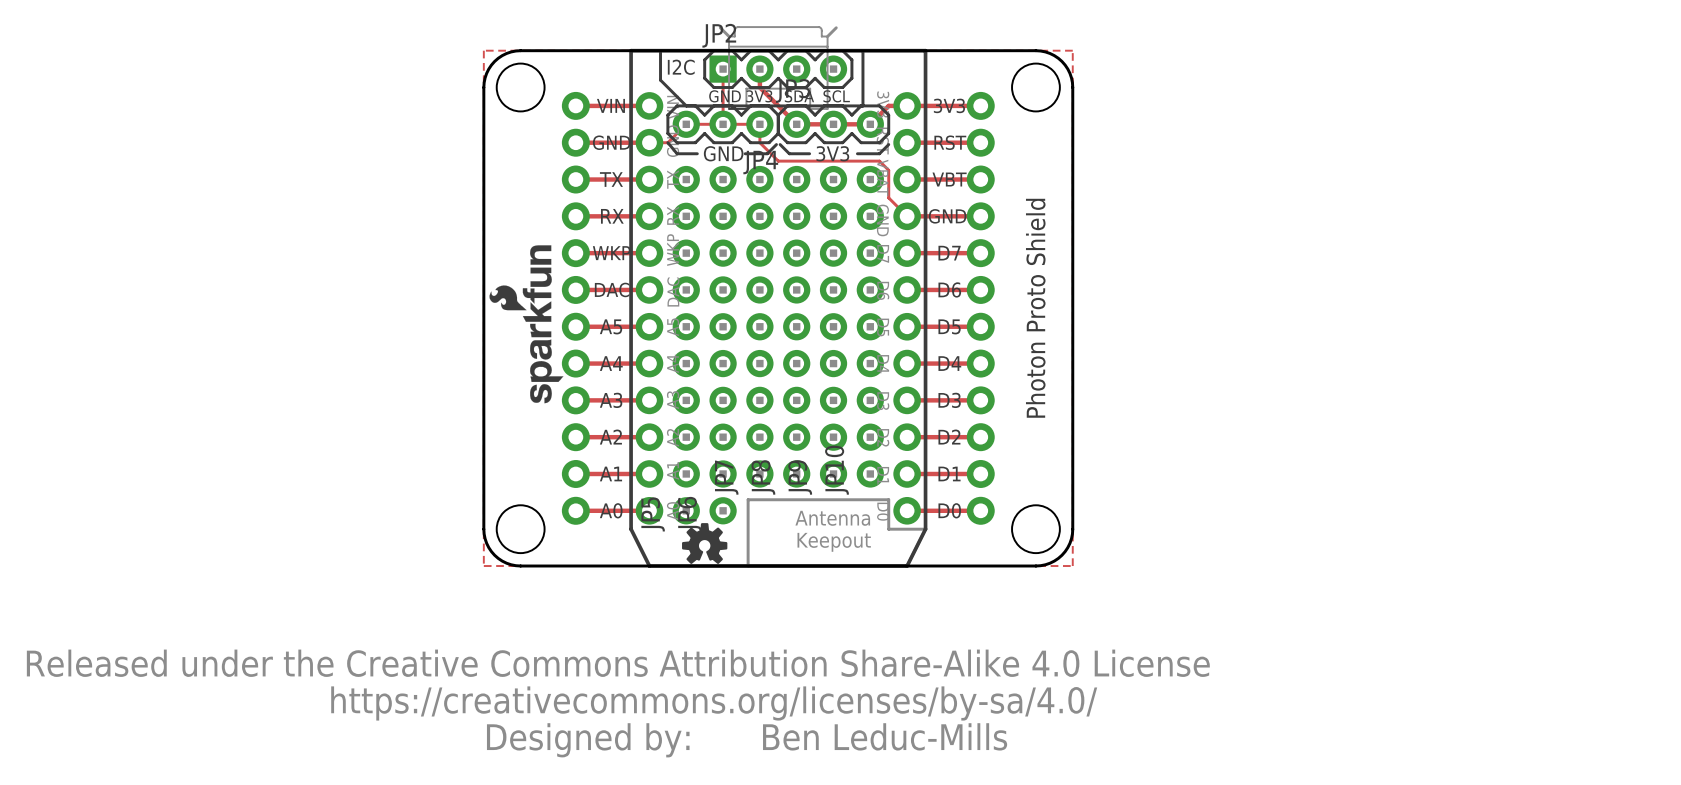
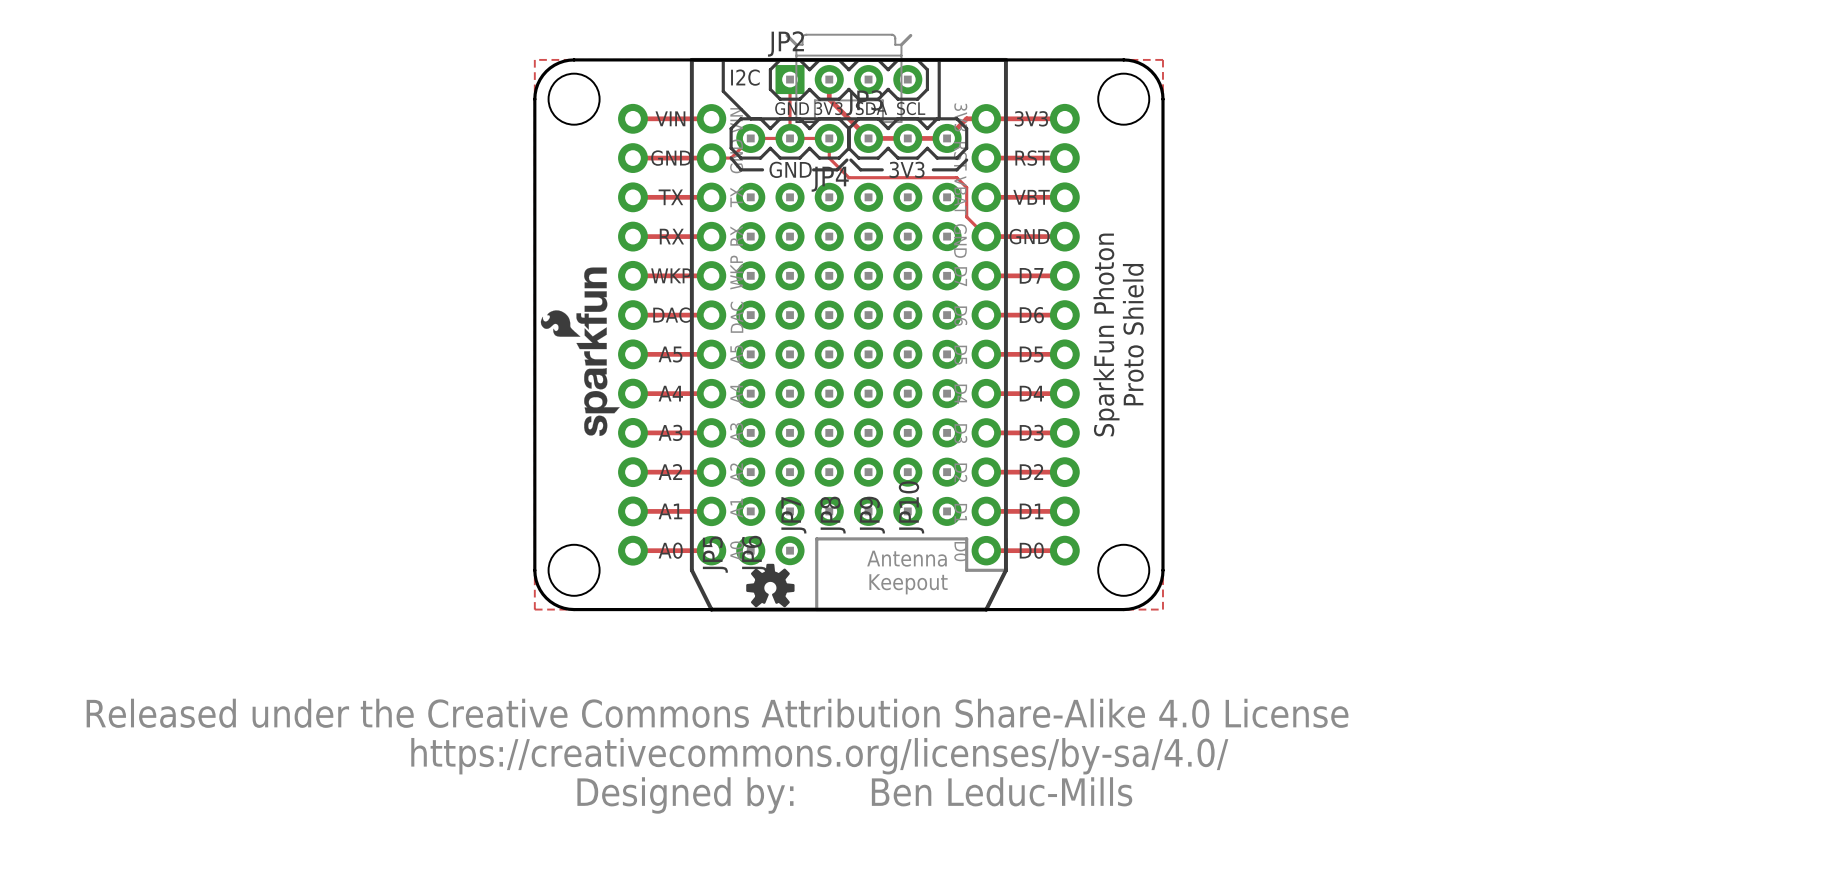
text: Photon Proto Shield (1035, 308) -> SparkFun Photon (1106, 334)
text: none -> Proto Shield (1133, 334)
drawing position: (618, 703) -> (717, 756)
text position: Ben Leduc-Mills (885, 736) -> Ben Leduc-Mills (1002, 791)

